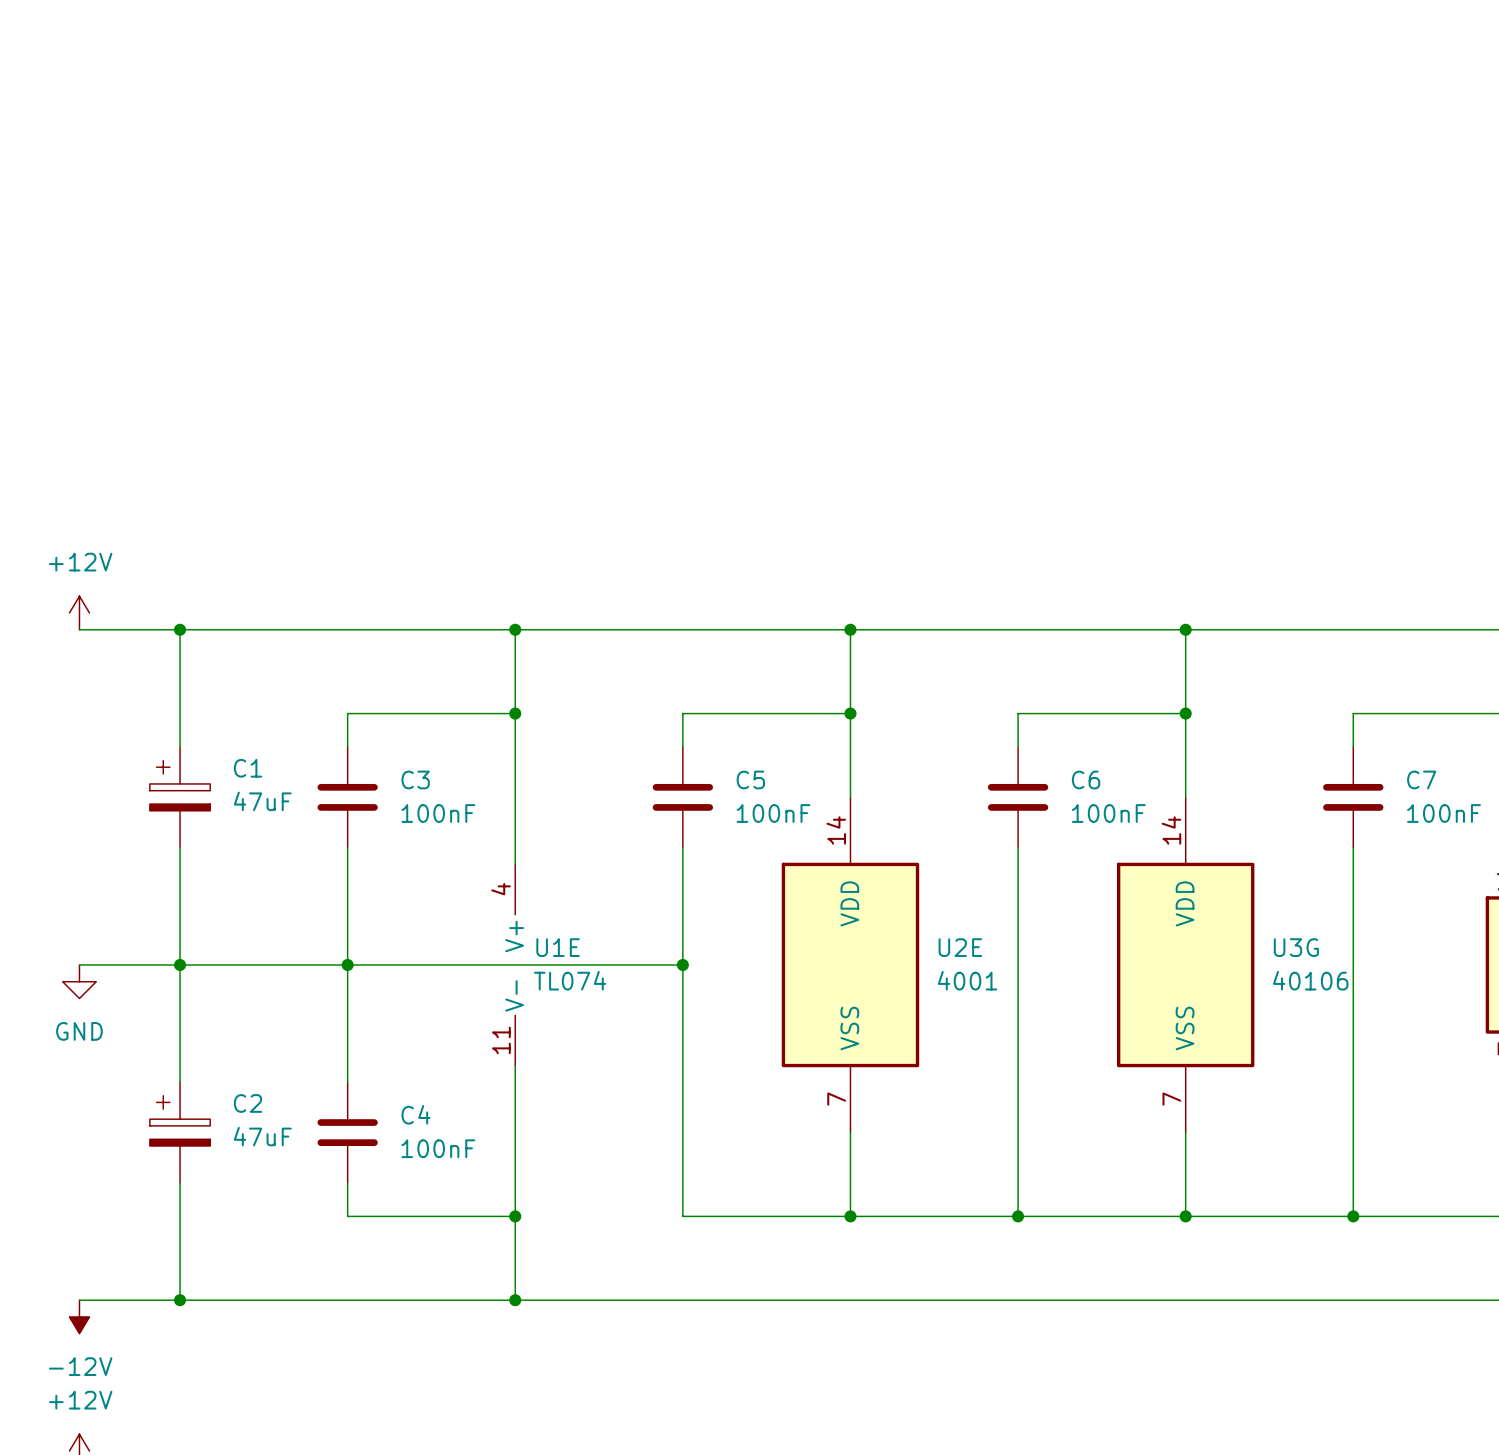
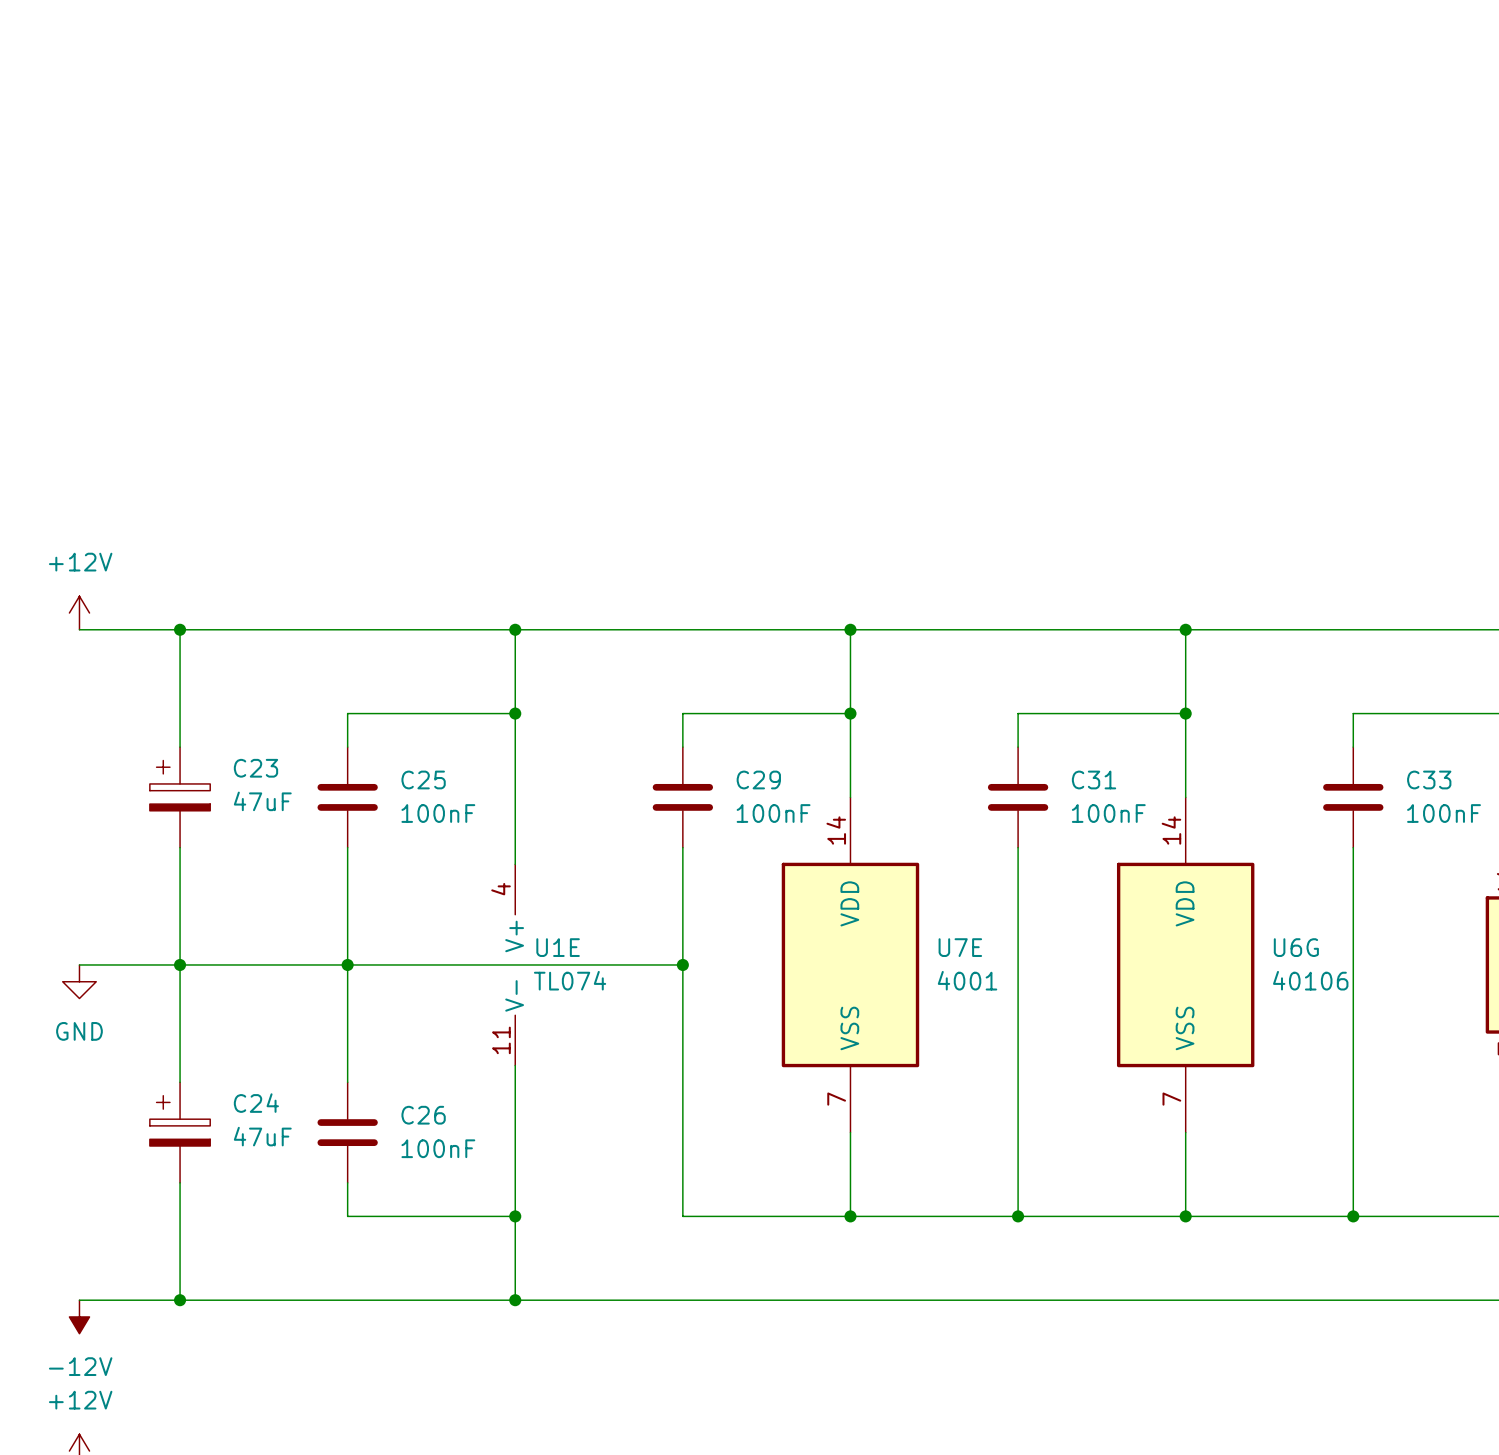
C1 name: C1 (248, 768) -> C23 (255, 768)
C3 name: C3 (415, 779) -> C25 (423, 779)
C5 name: C5 (750, 779) -> C29 (758, 779)
C6 name: C6 (1086, 779) -> C31 (1094, 779)
C7 name: C7 (1421, 779) -> C33 (1429, 779)
U2E name: U2E (960, 947) -> U7E (960, 947)
U3G name: U3G (1296, 947) -> U6G (1296, 947)
C2 name: C2 (248, 1103) -> C24 (256, 1103)
C4 name: C4 (416, 1114) -> C26 (423, 1115)

